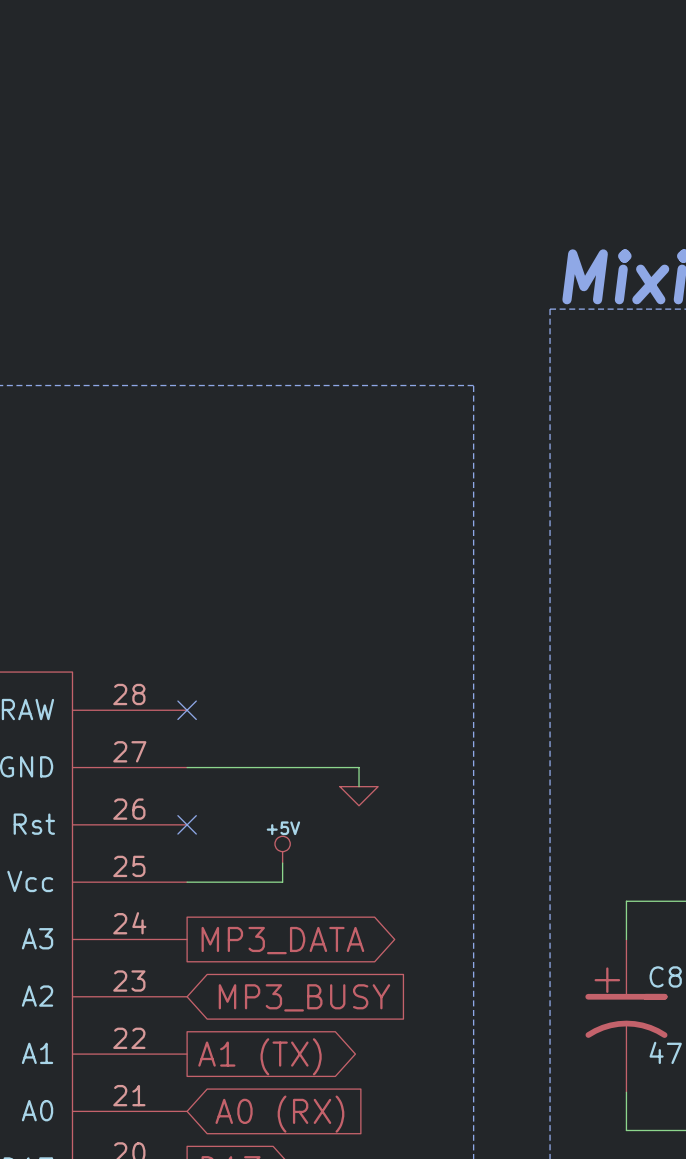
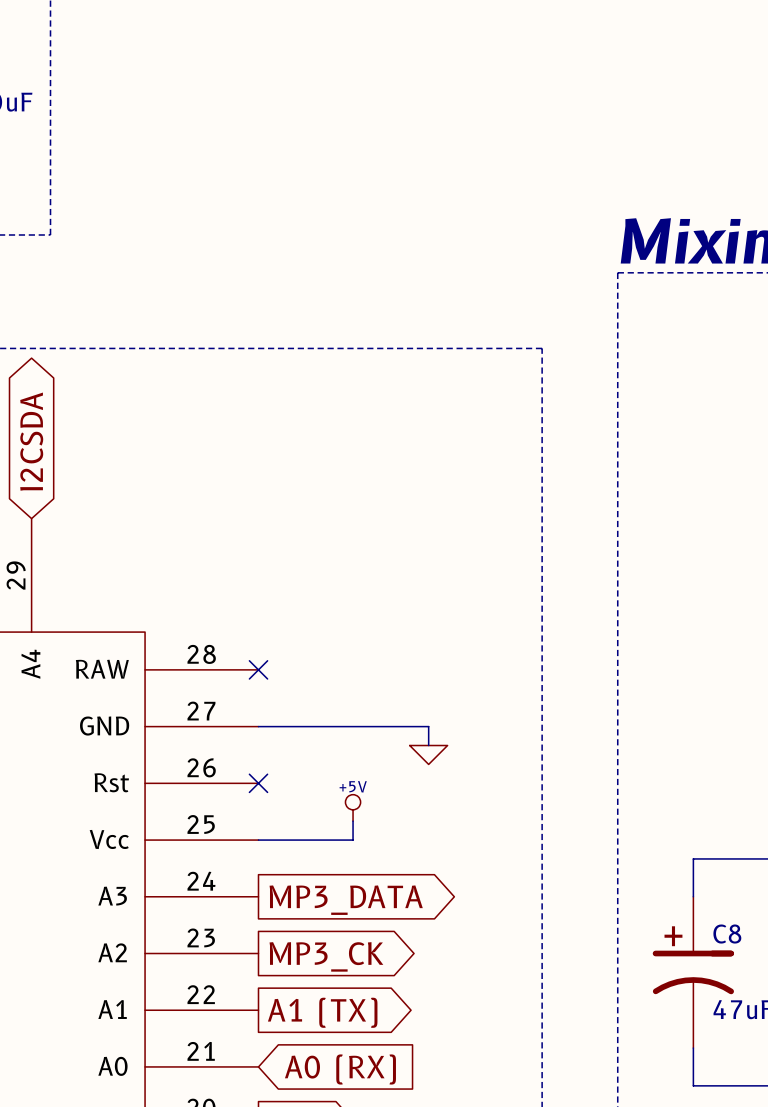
global label shape: input (304, 997) -> output (326, 956)
global label: MP3_BUSY (304, 997) -> MP3_CK (326, 956)

